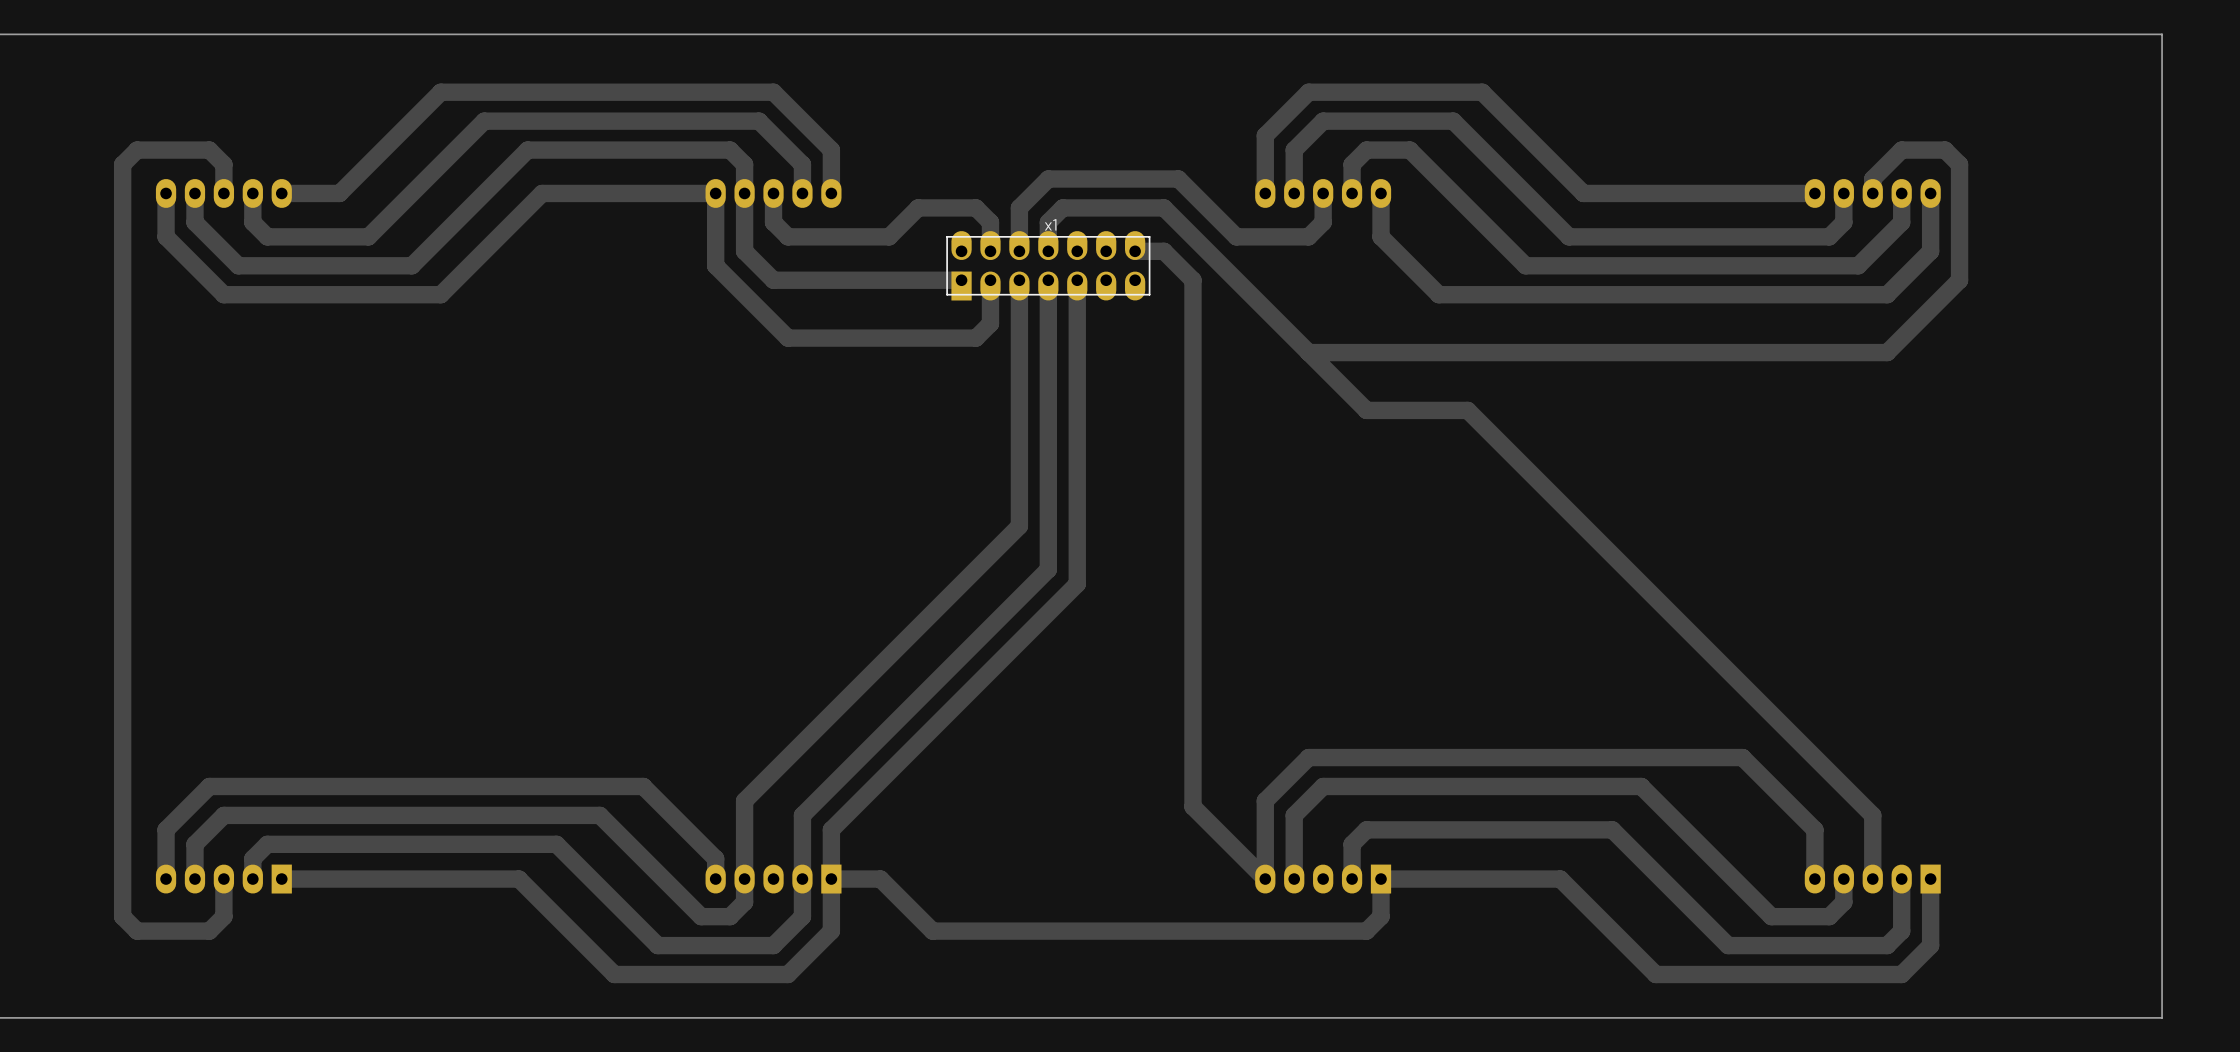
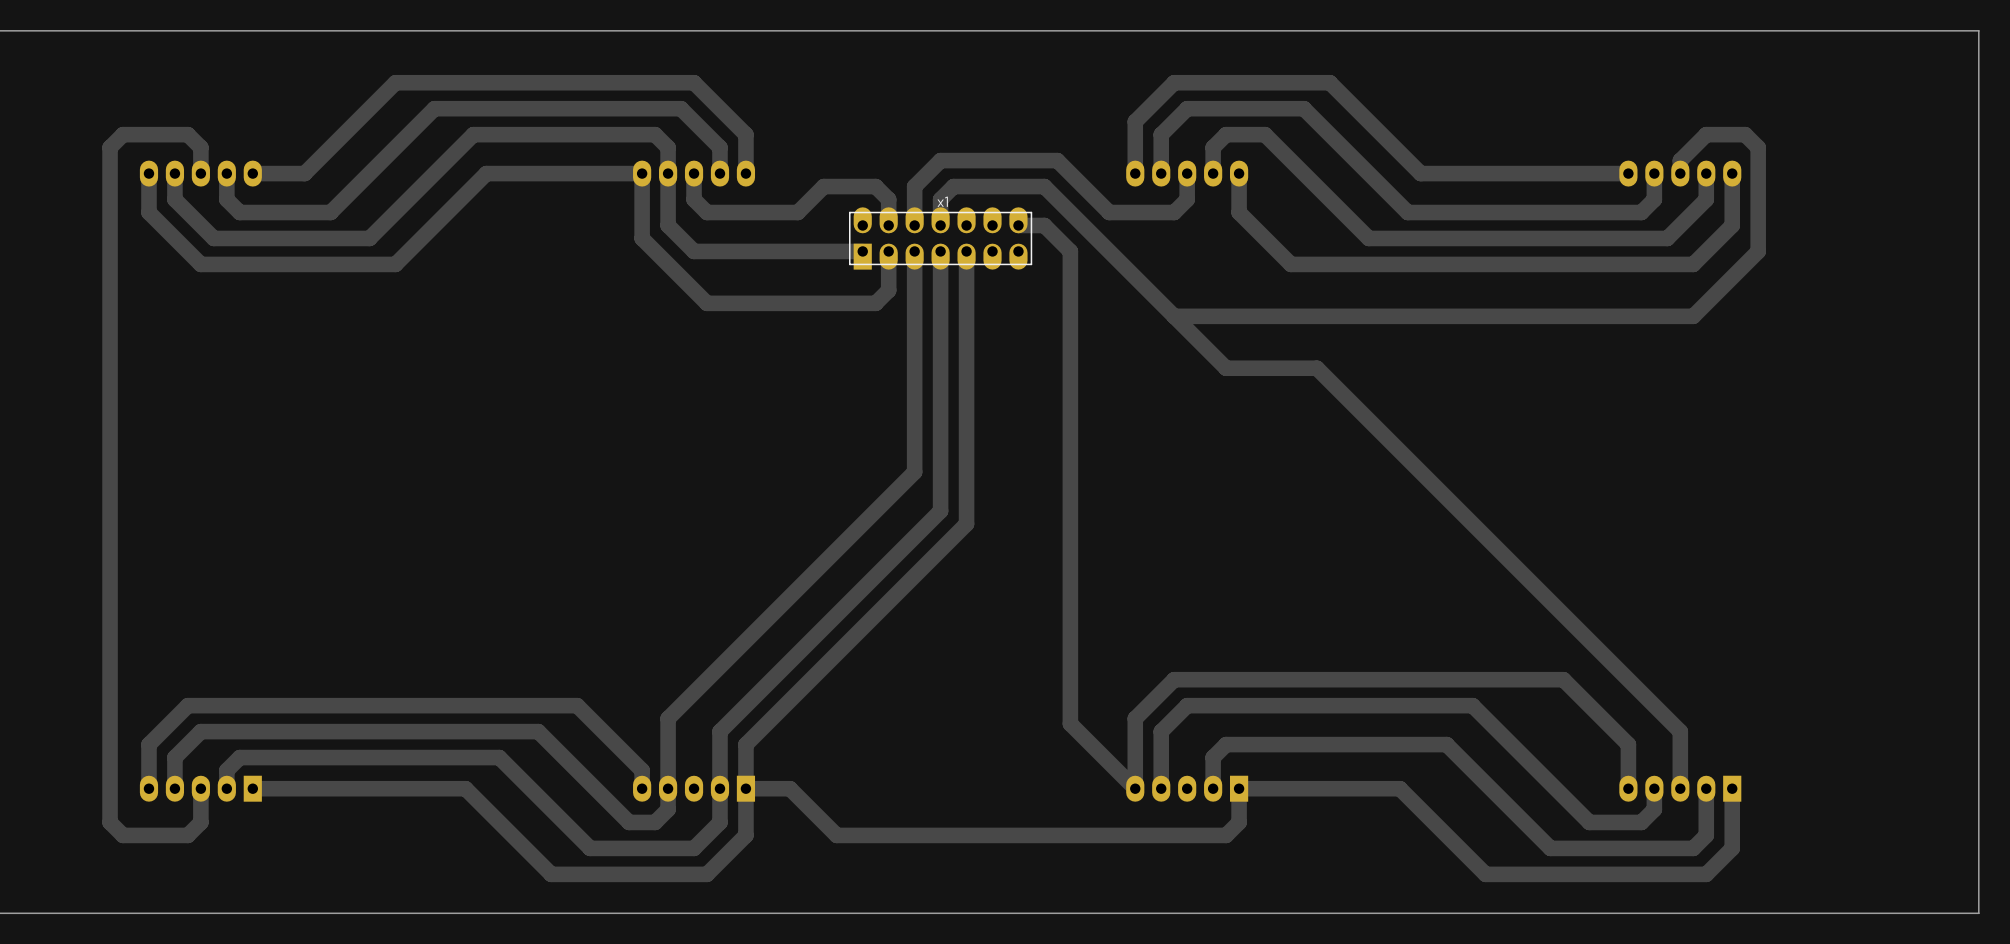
board edge: (2162, 34) (2162, 1017) -> (1939, 30) (1978, 30) (1978, 913) (1939, 913)

